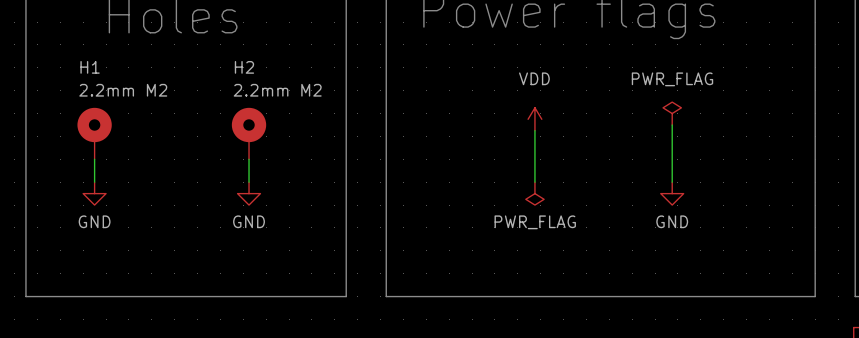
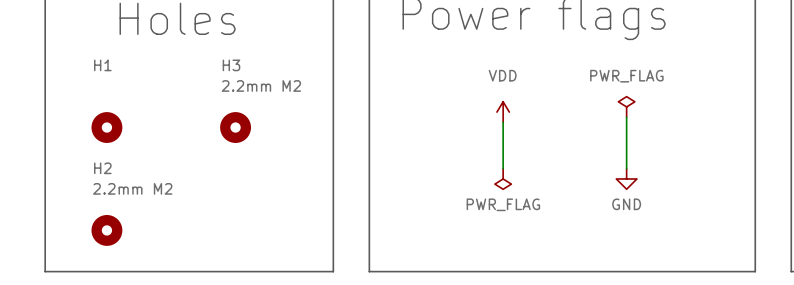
H1 value: 2.2mm M2 (123, 90) -> none
H1 symbol: [77, 107, 112, 160] -> [91, 112, 123, 143]
H2 symbol: [231, 107, 267, 160] -> [91, 215, 123, 246]
H3: none -> 2.2mm M2 (235, 127)
wire: (94, 159) (94, 182) -> none
wire: (249, 159) (249, 182) -> none
power symbol: GND (94, 193) -> none
power symbol: GND (249, 193) -> none

